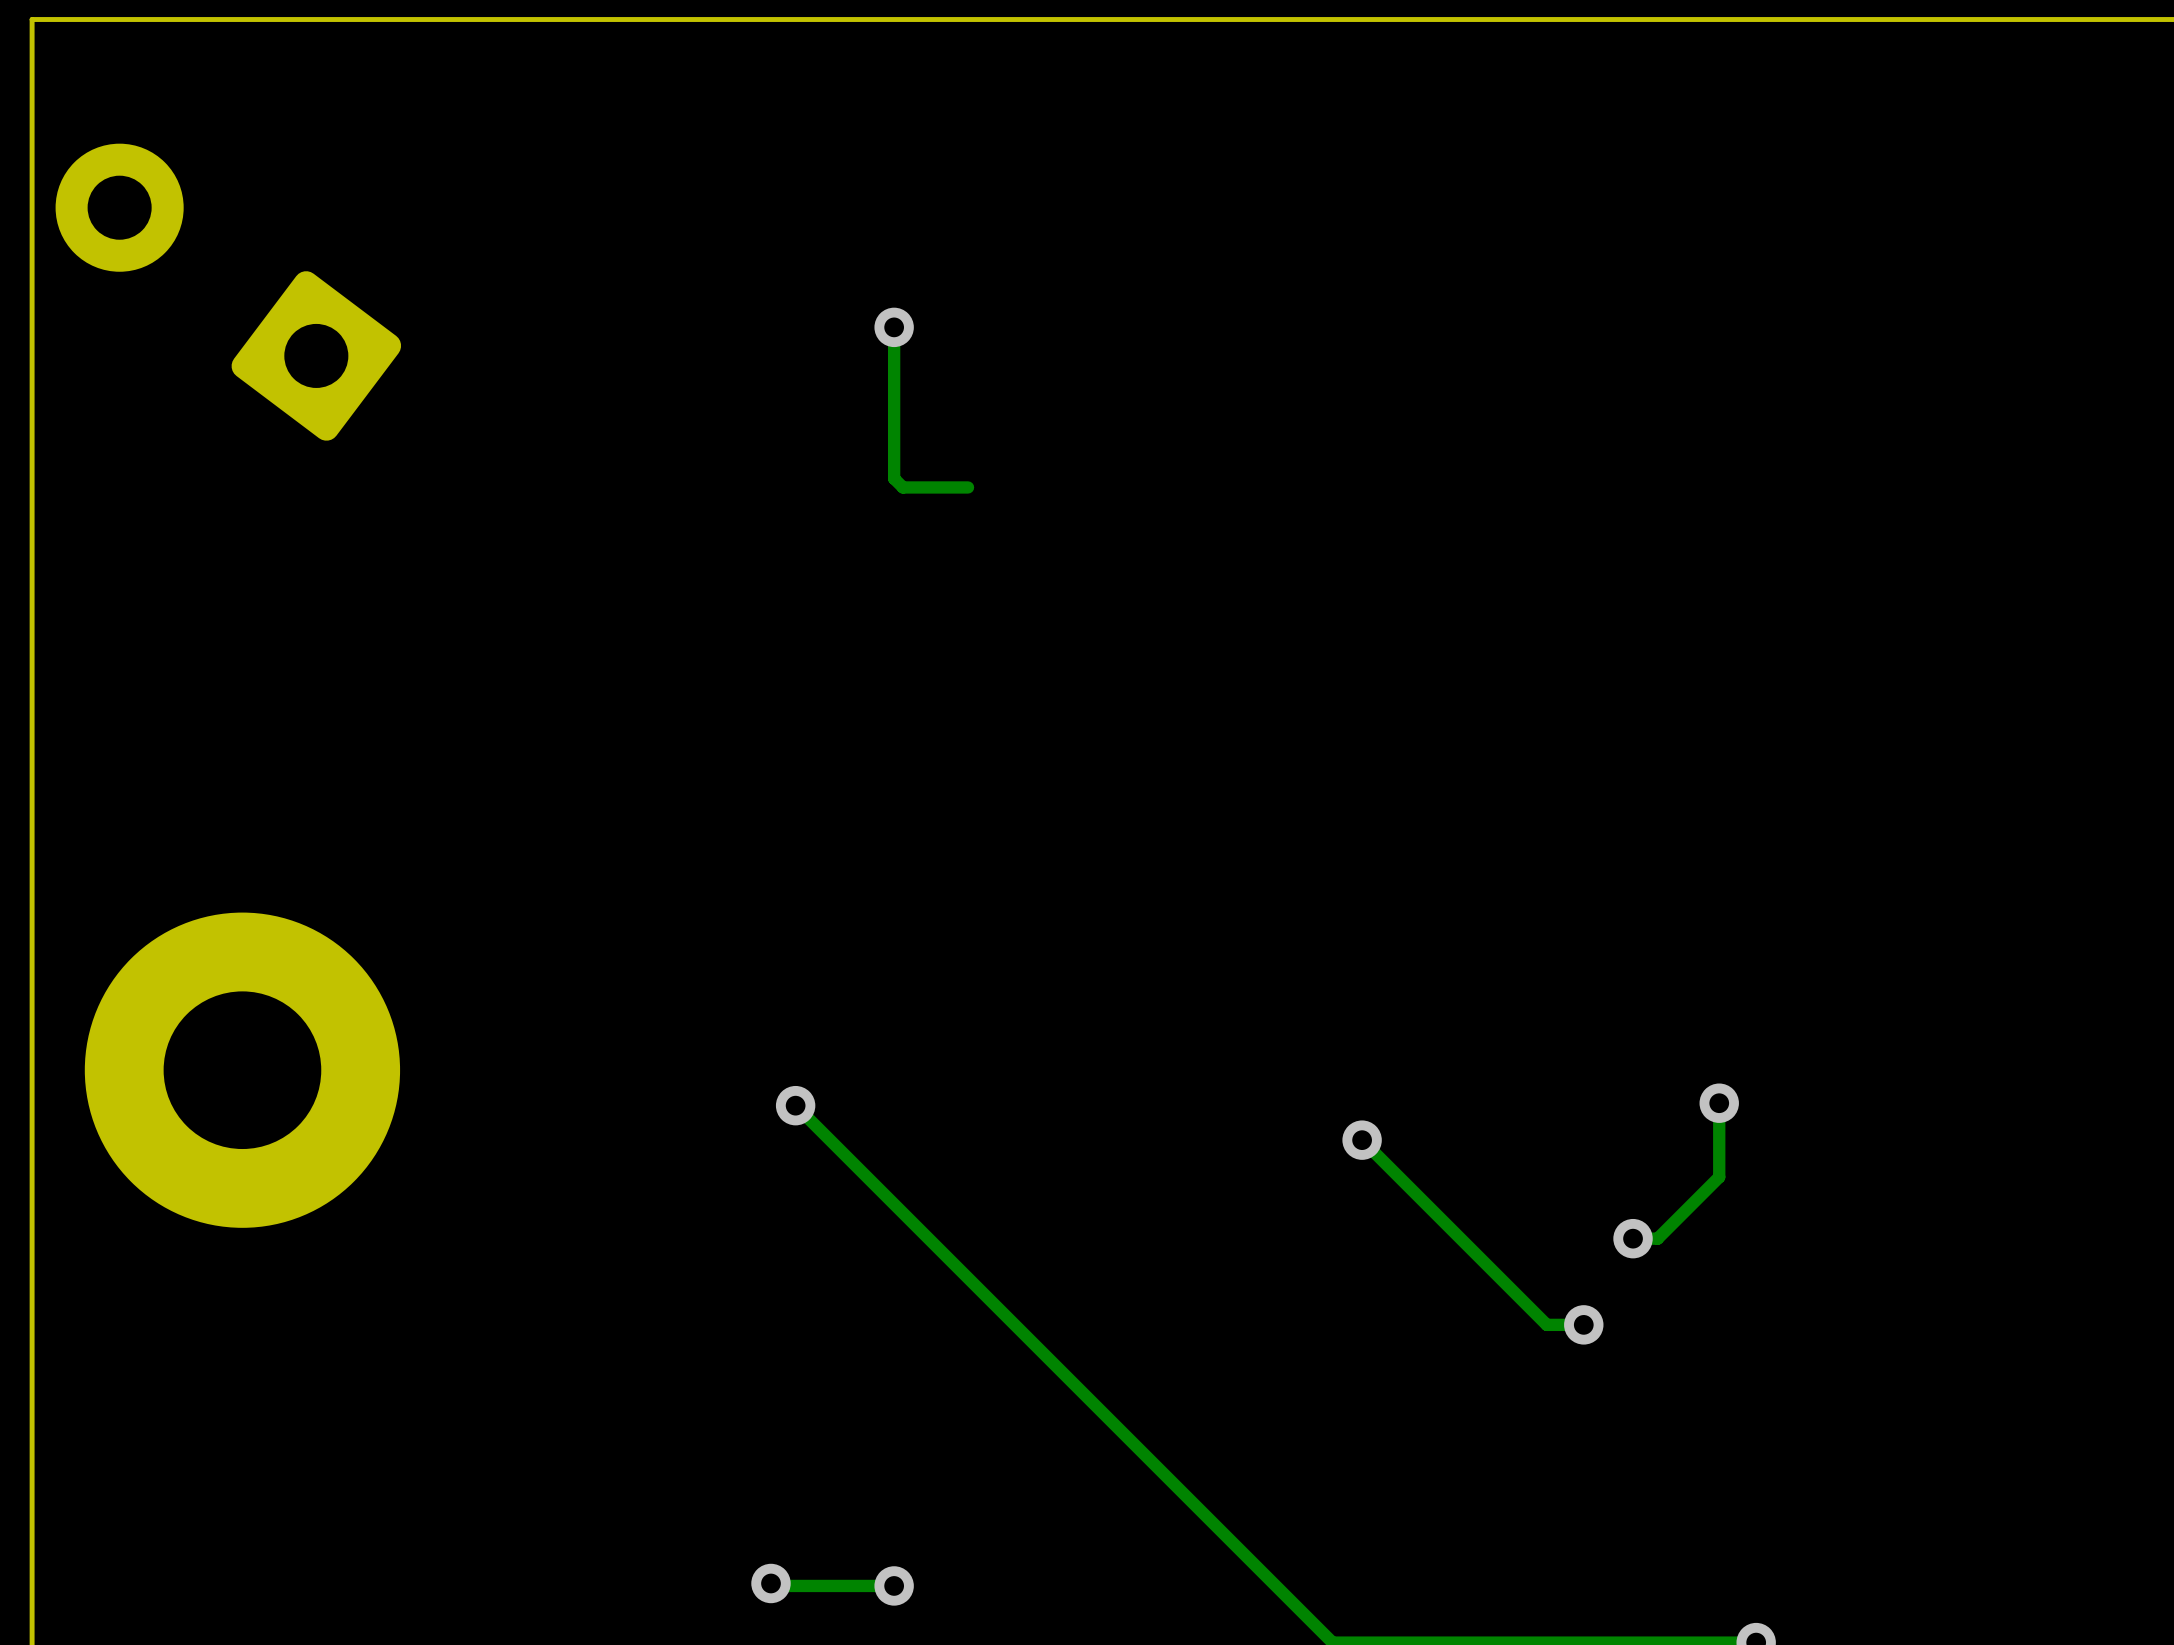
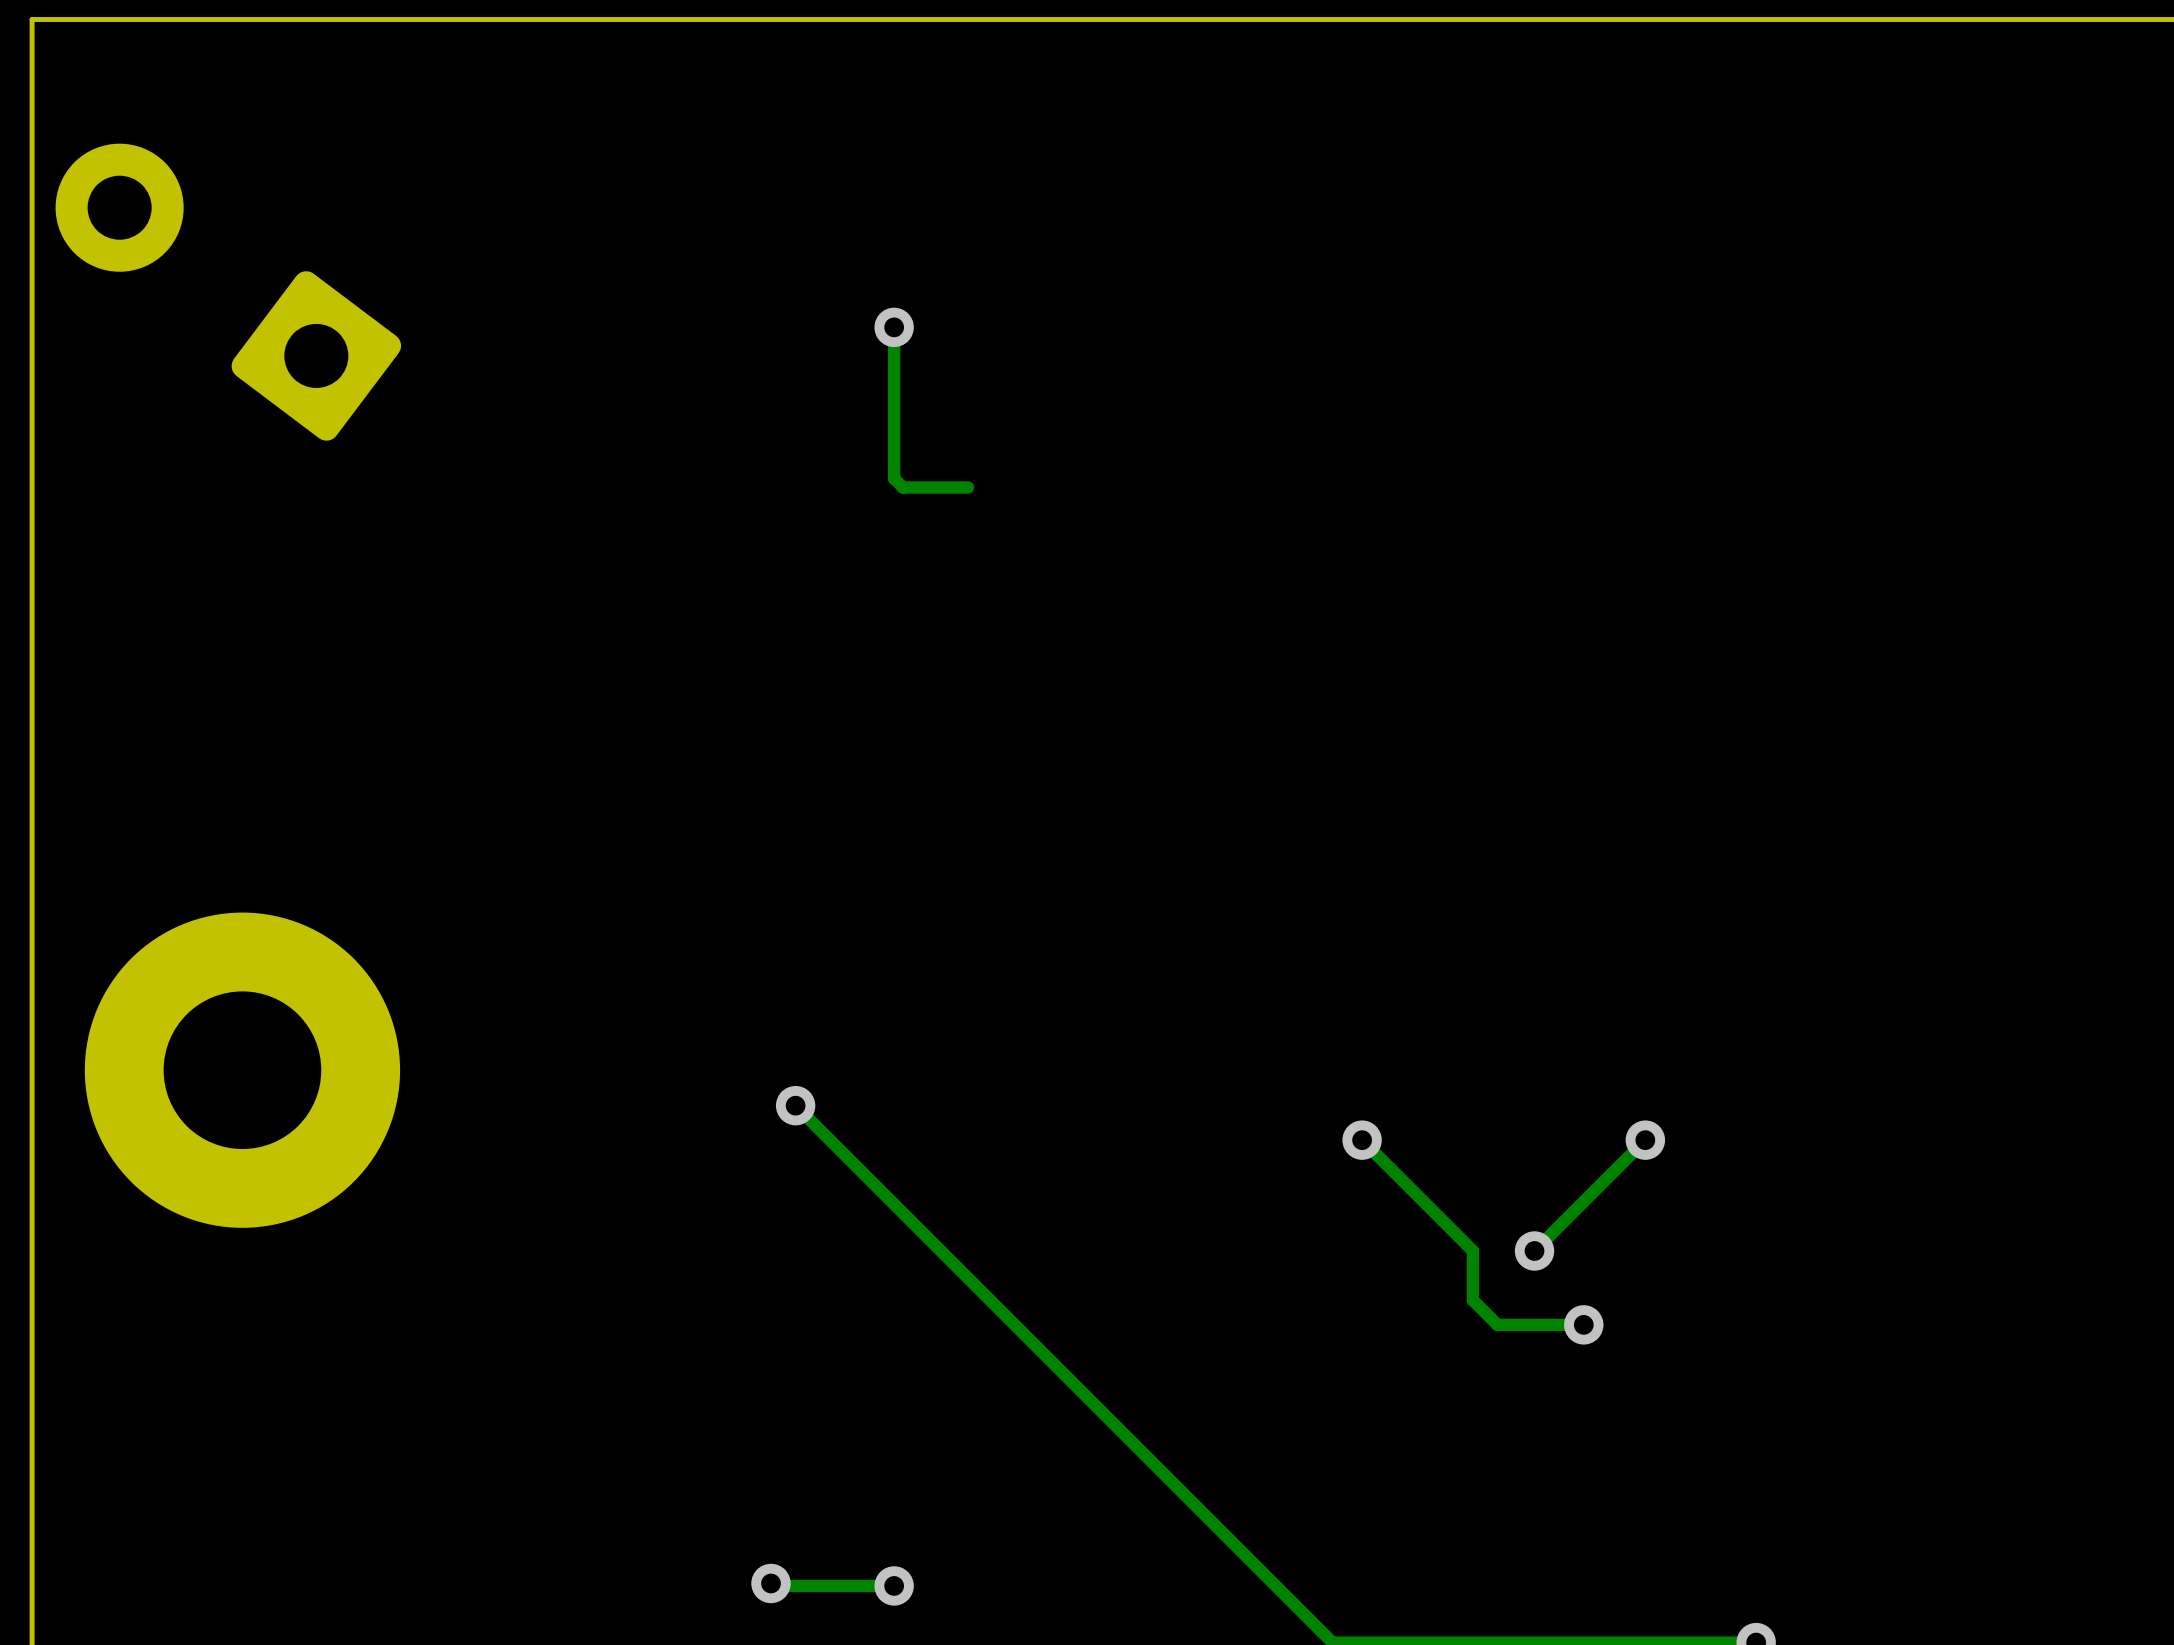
track: (1719, 1103) (1719, 1177) (1657, 1238) (1633, 1238) -> none
via: (1719, 1103) -> none
track: none -> (1645, 1140) (1534, 1250)
via: none -> (1645, 1140)
via: (1633, 1238) -> none
track: (1472, 1250) (1546, 1324) -> (1472, 1250) (1472, 1300) (1497, 1324) (1546, 1324)
via: none -> (1534, 1250)

